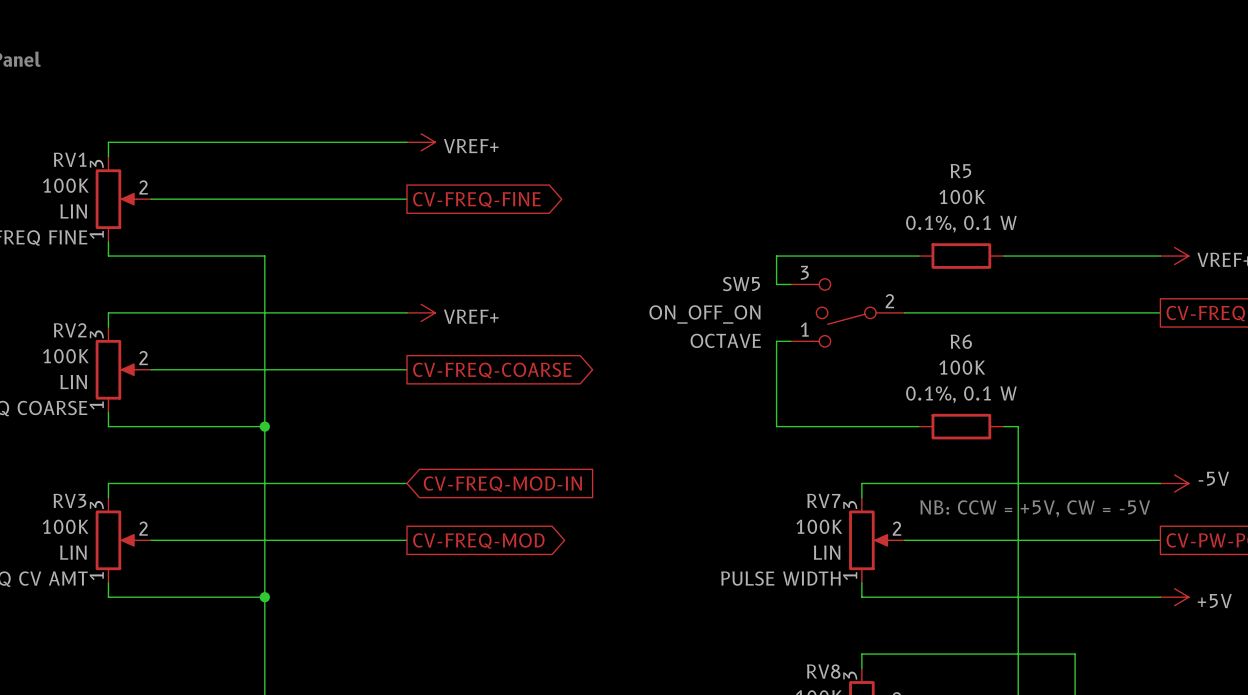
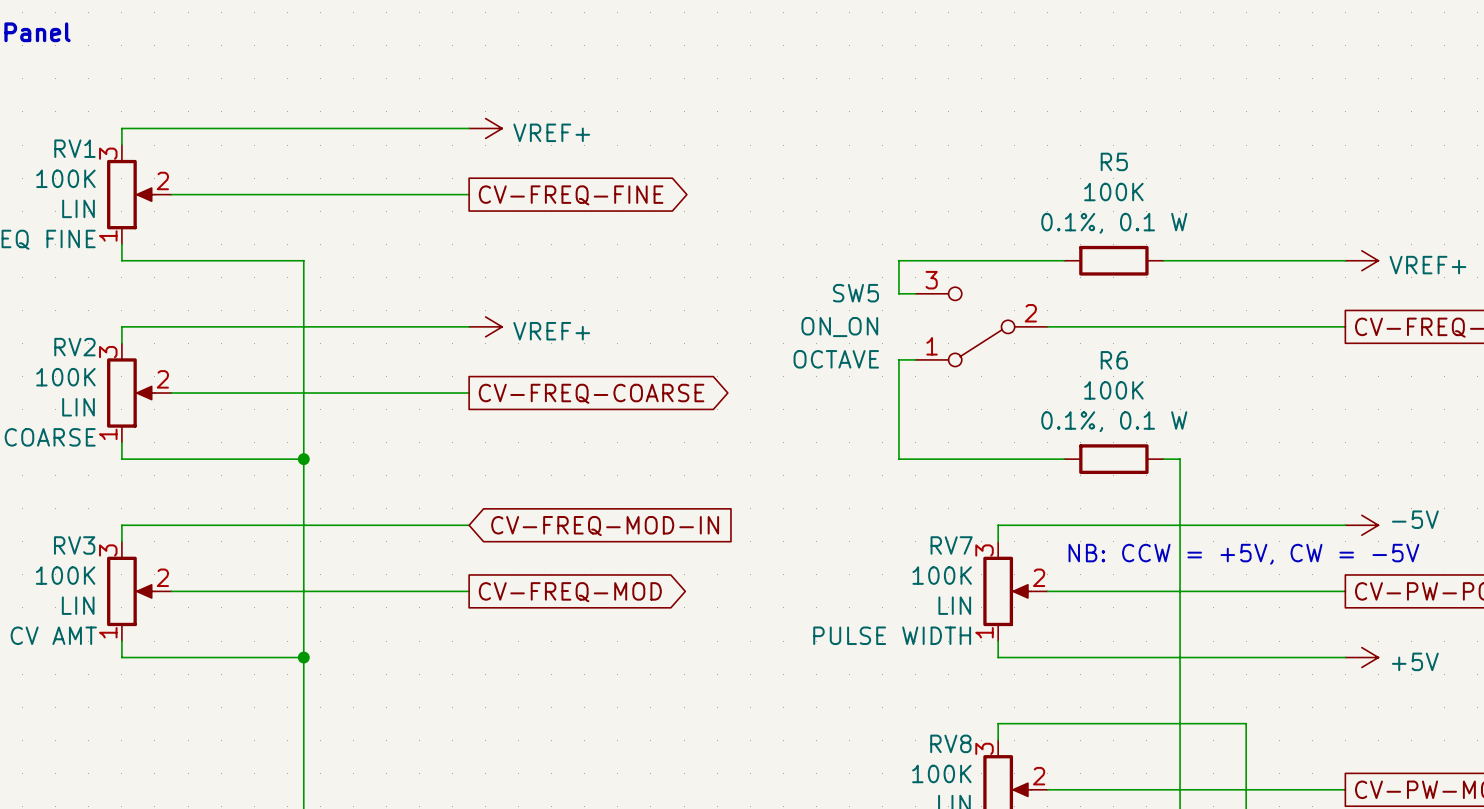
SW5 symbol: [790, 278, 905, 348] -> [915, 287, 1048, 367]
SW5 value: ON_OFF_ON (704, 314) -> ON_ON (839, 327)

